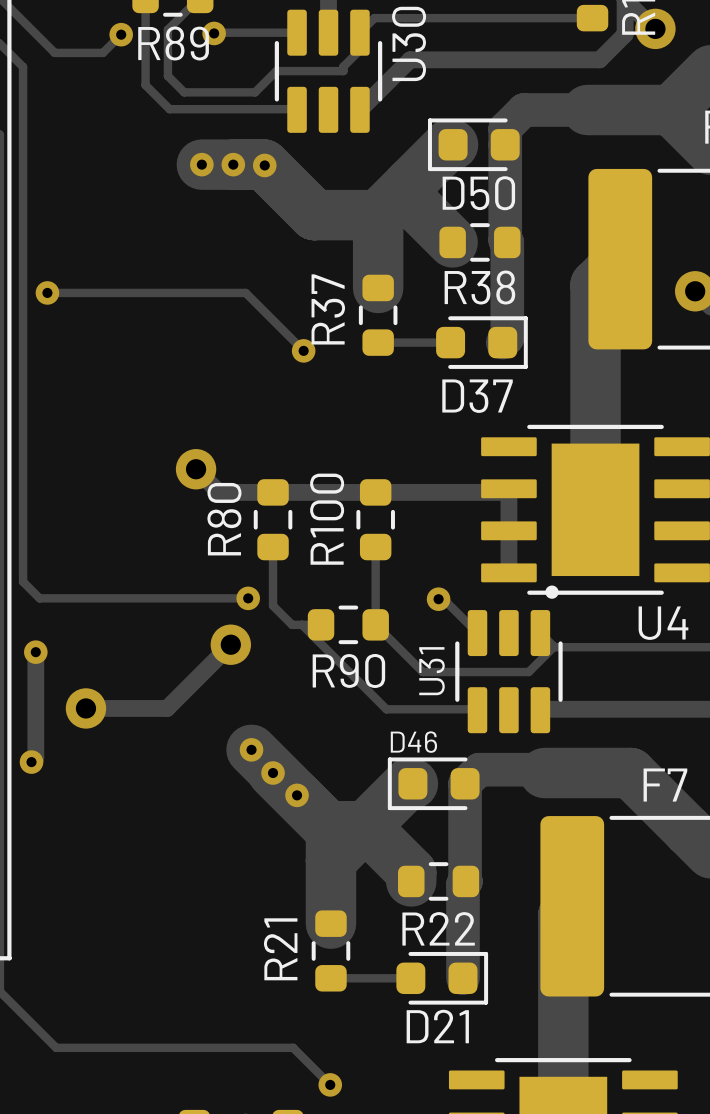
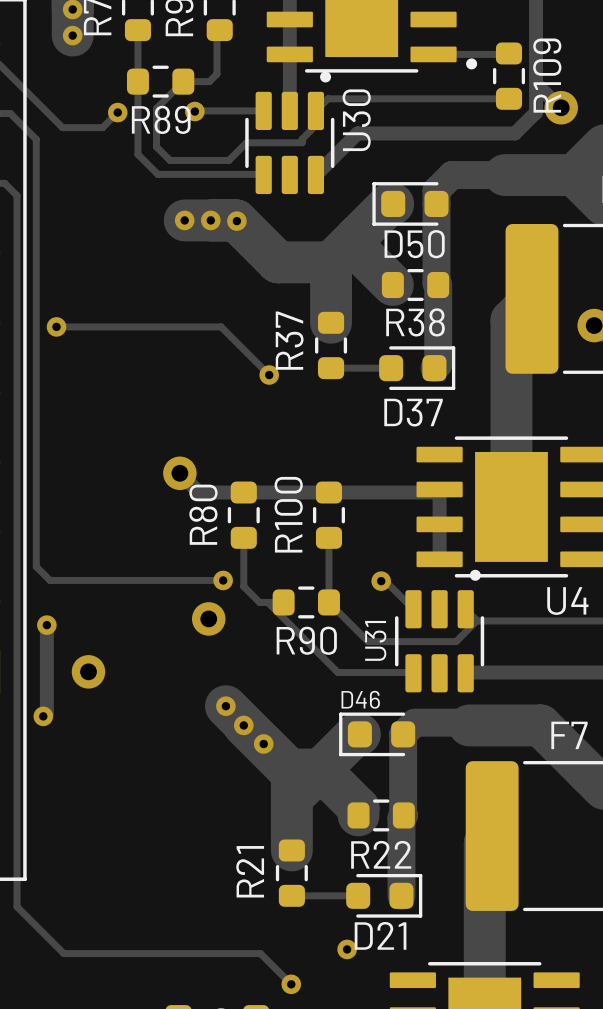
track: (230, 644) (167, 708) (85, 708) -> none
via: none -> (347, 949)

